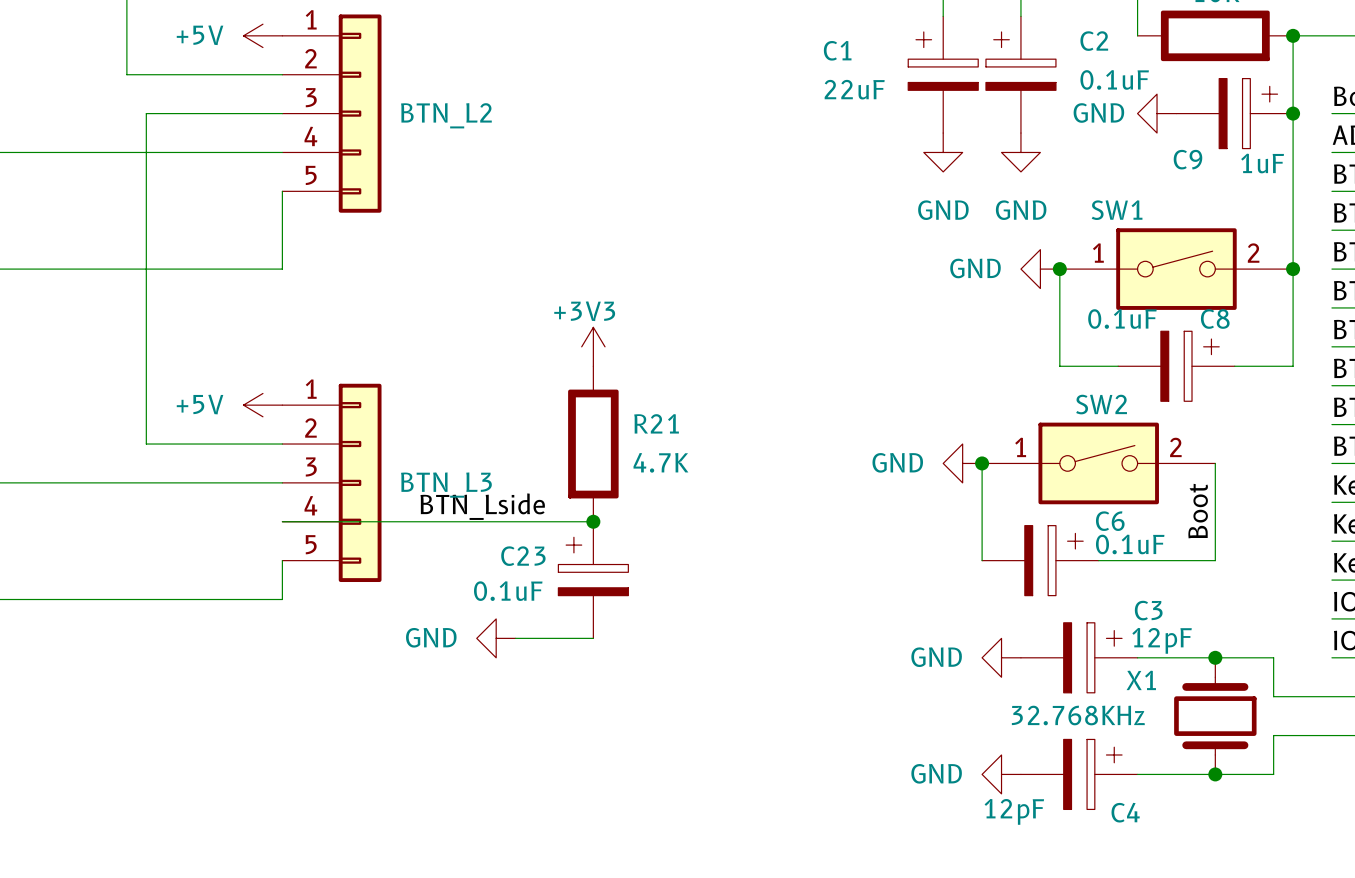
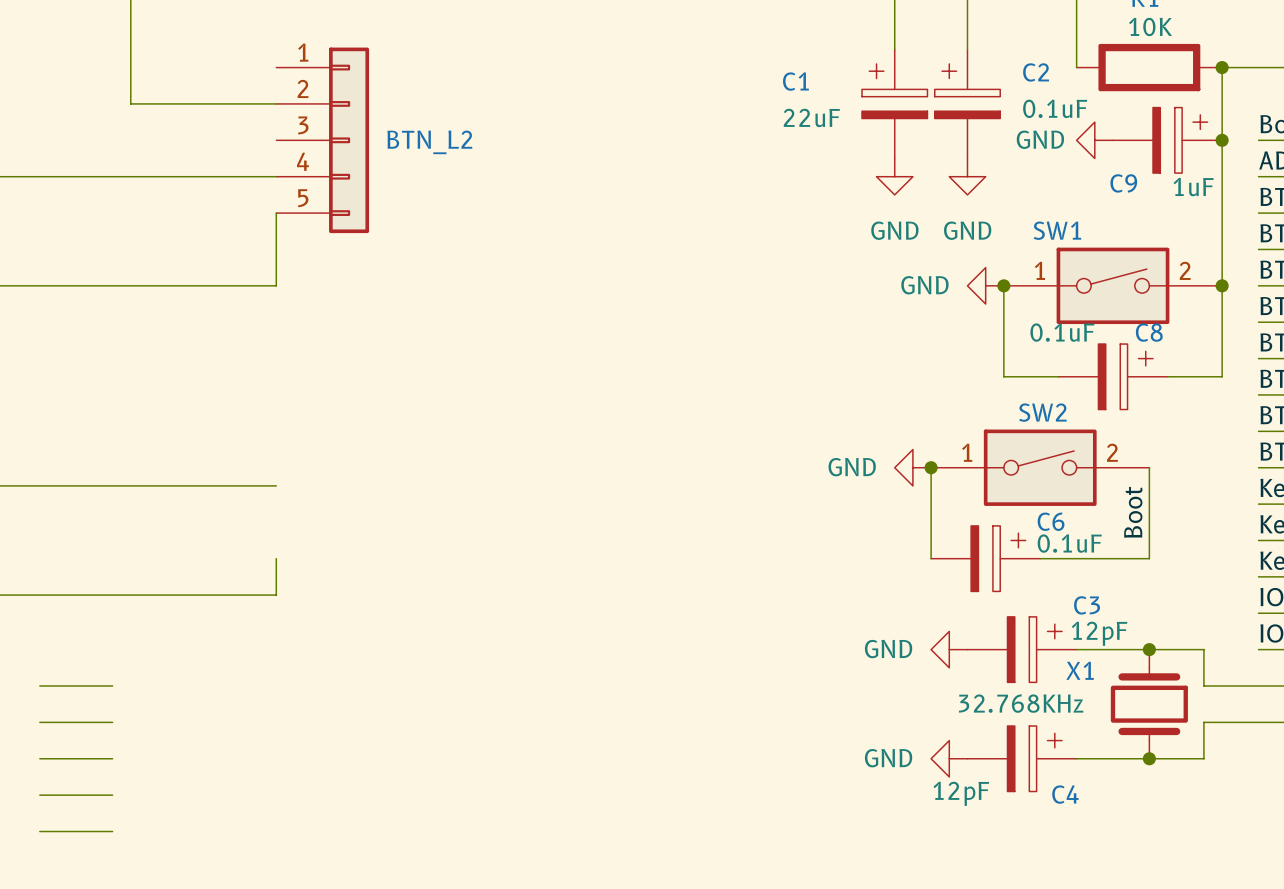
power symbol: +5V (262, 35) -> none
wire: (282, 113) (146, 113) (146, 444) (282, 444) -> none
power symbol: +3V3 (593, 346) -> none
power symbol: +5V (262, 405) -> none
R21: 4.7K (593, 444) -> none
BTN_L3: (331, 482) -> none
label: BTN_Lside (482, 506) -> none
wire: (282, 521) (593, 521) -> none
junction: (593, 521) -> none
C23: 0.1uF (593, 580) -> none
power symbol: GND (496, 638) -> none
wire: (515, 638) (593, 638) -> none
wire: none -> (39, 686) (112, 686)
wire: none -> (39, 722) (112, 722)
wire: none -> (39, 758) (112, 758)
wire: none -> (39, 795) (112, 795)
wire: none -> (39, 831) (112, 831)

